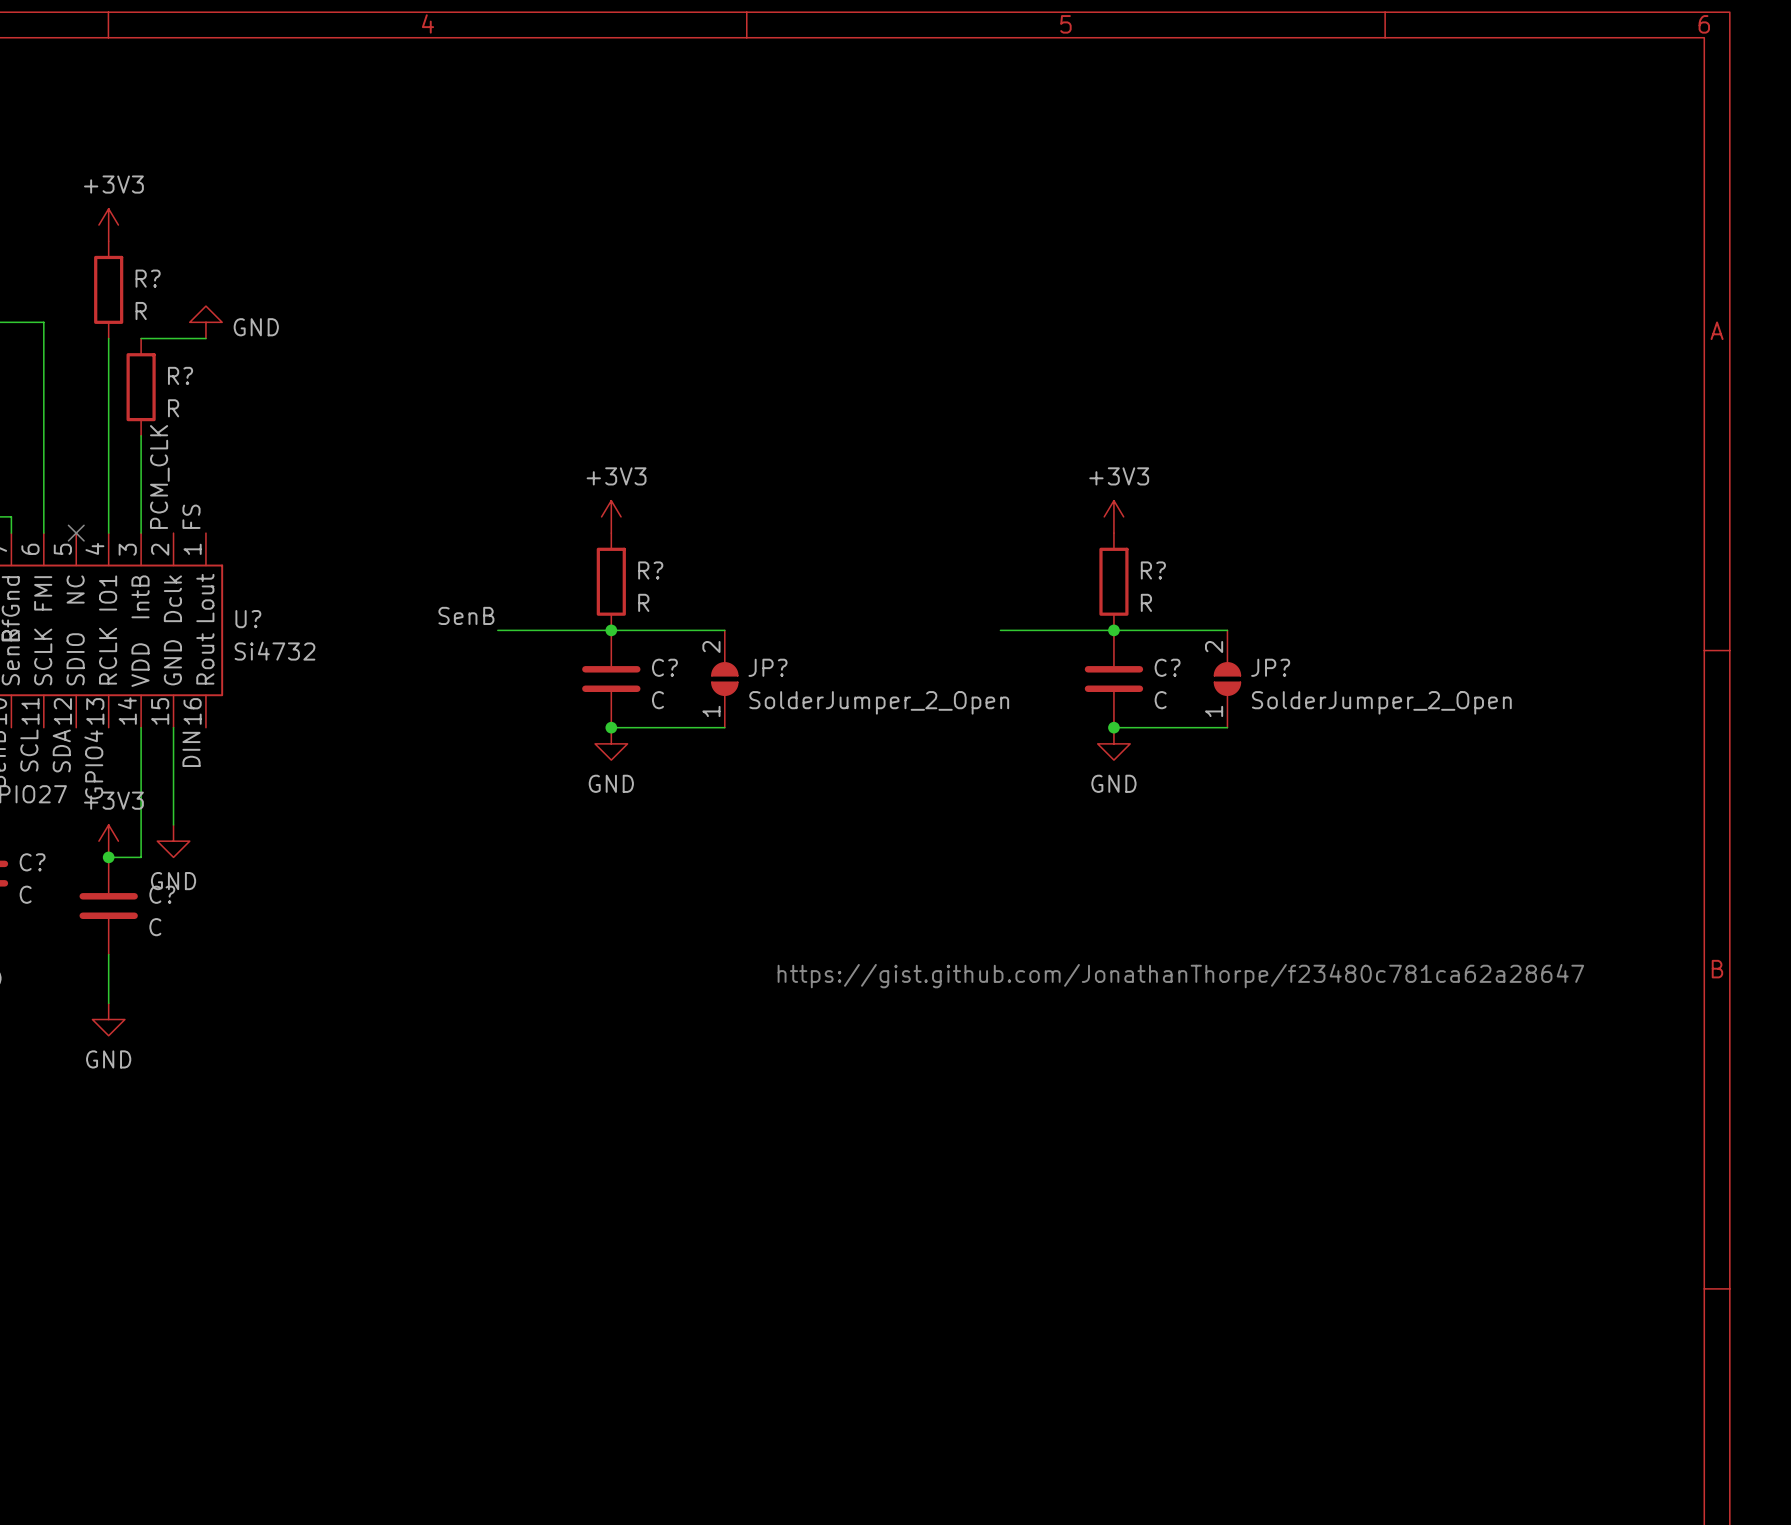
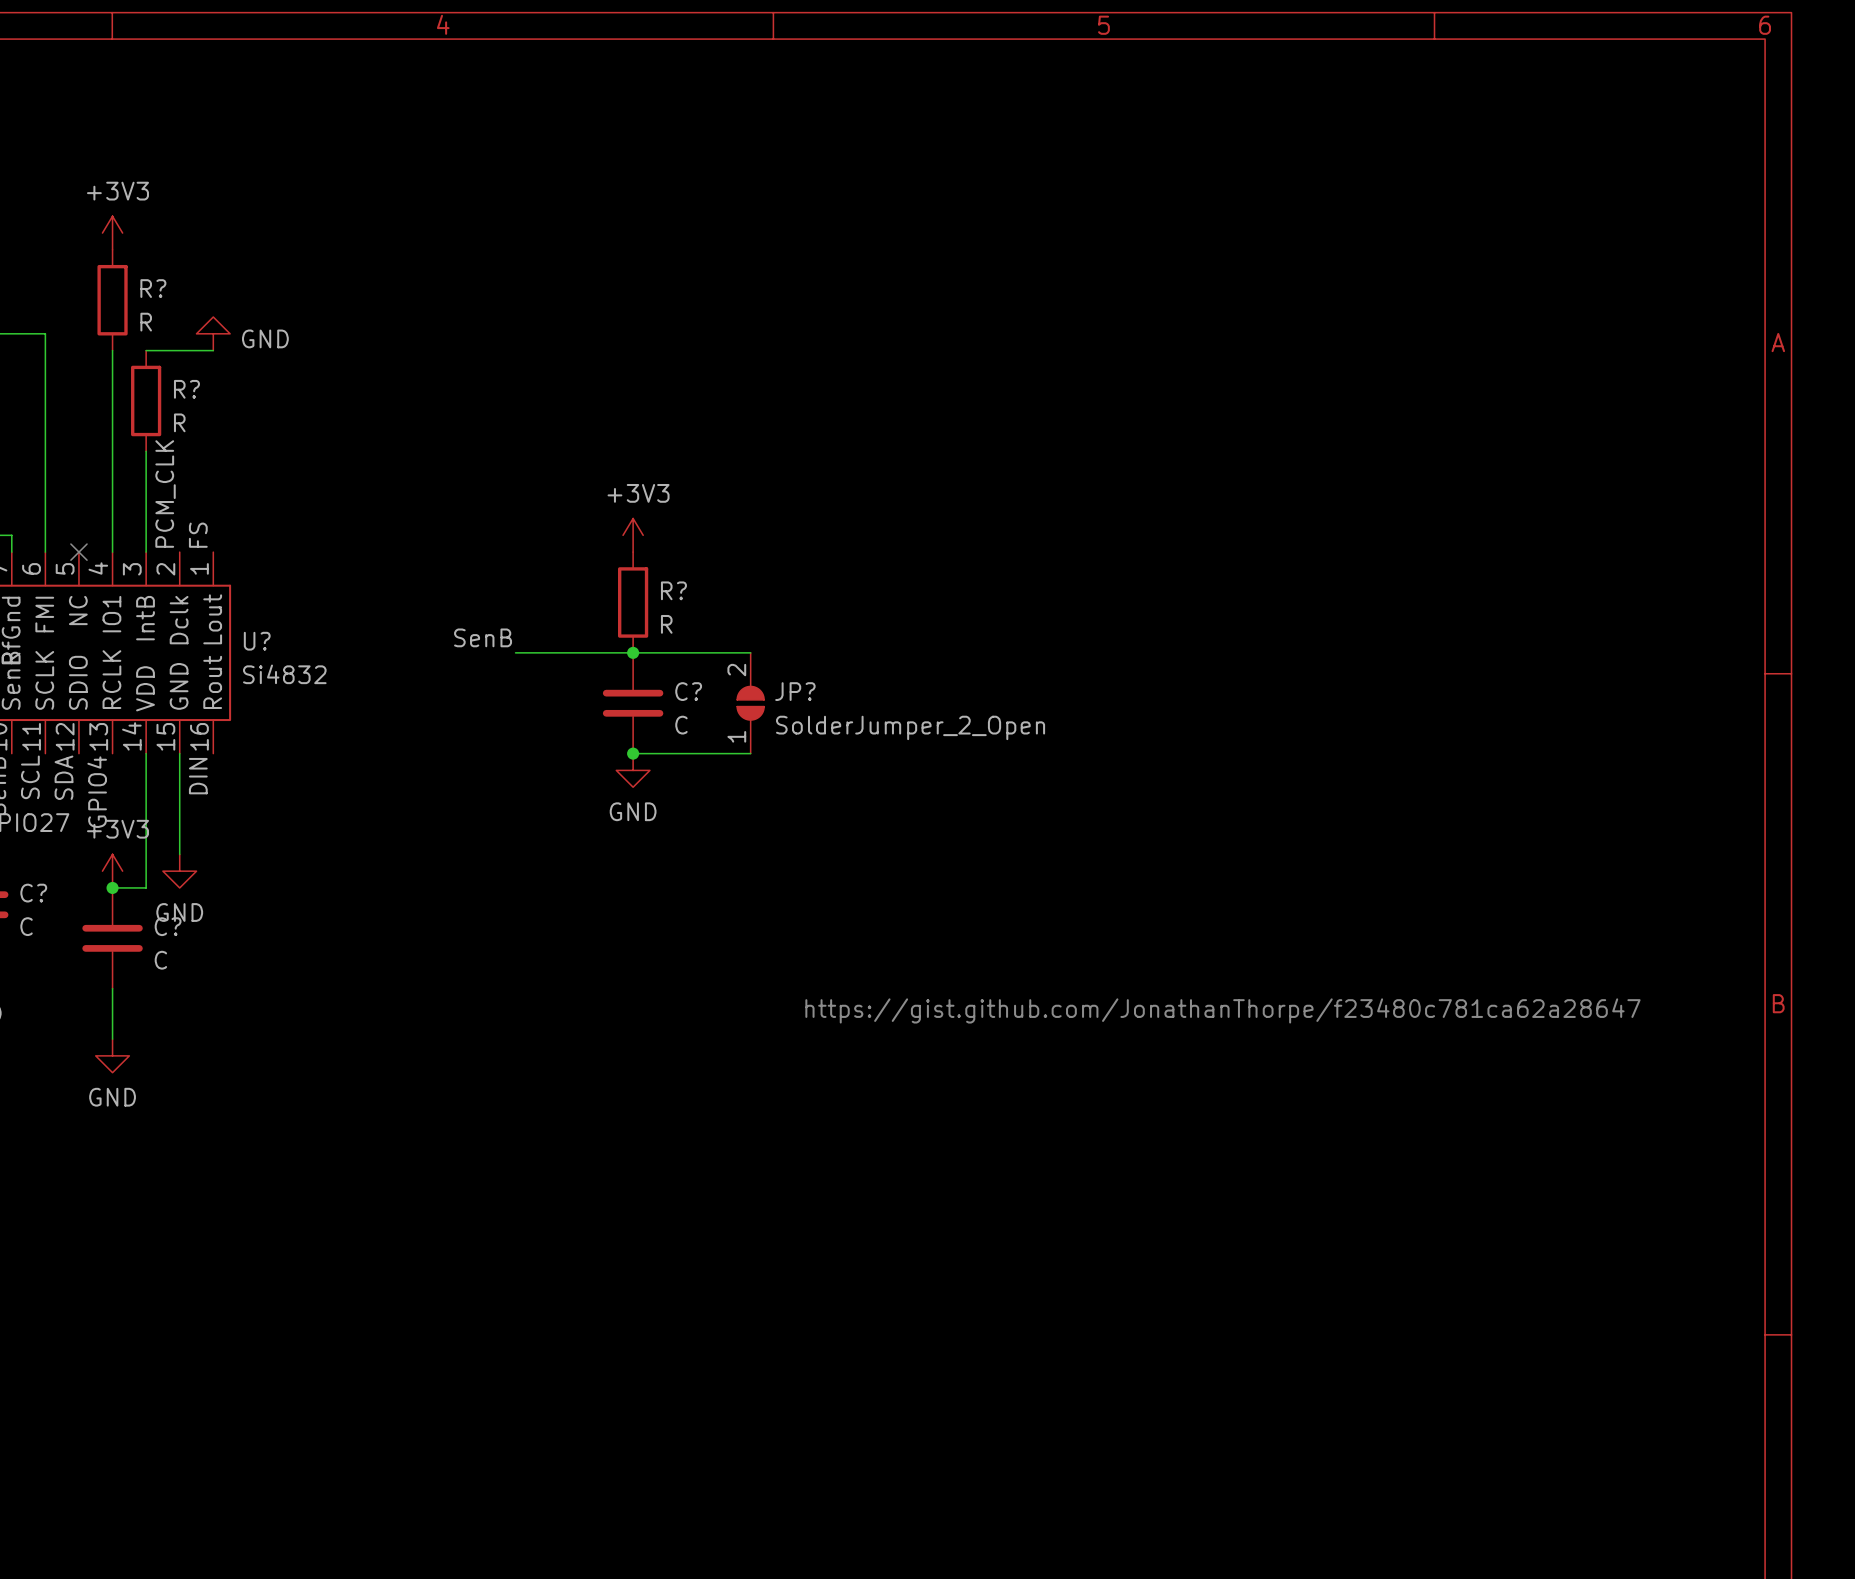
power symbol: +3V3 (1113, 516) -> none
R?: R (1113, 581) -> none
wire: (1000, 630) (1227, 630) -> none
junction: (1113, 630) -> none
U? value: Si4732 (275, 651) -> Si4832 (284, 674)
C?: C (1113, 679) -> none
JP?: SolderJumper_2_Open (1227, 679) -> none
wire: (1113, 727) (1227, 727) -> none
junction: (1113, 727) -> none
power symbol: GND (1113, 743) -> none

